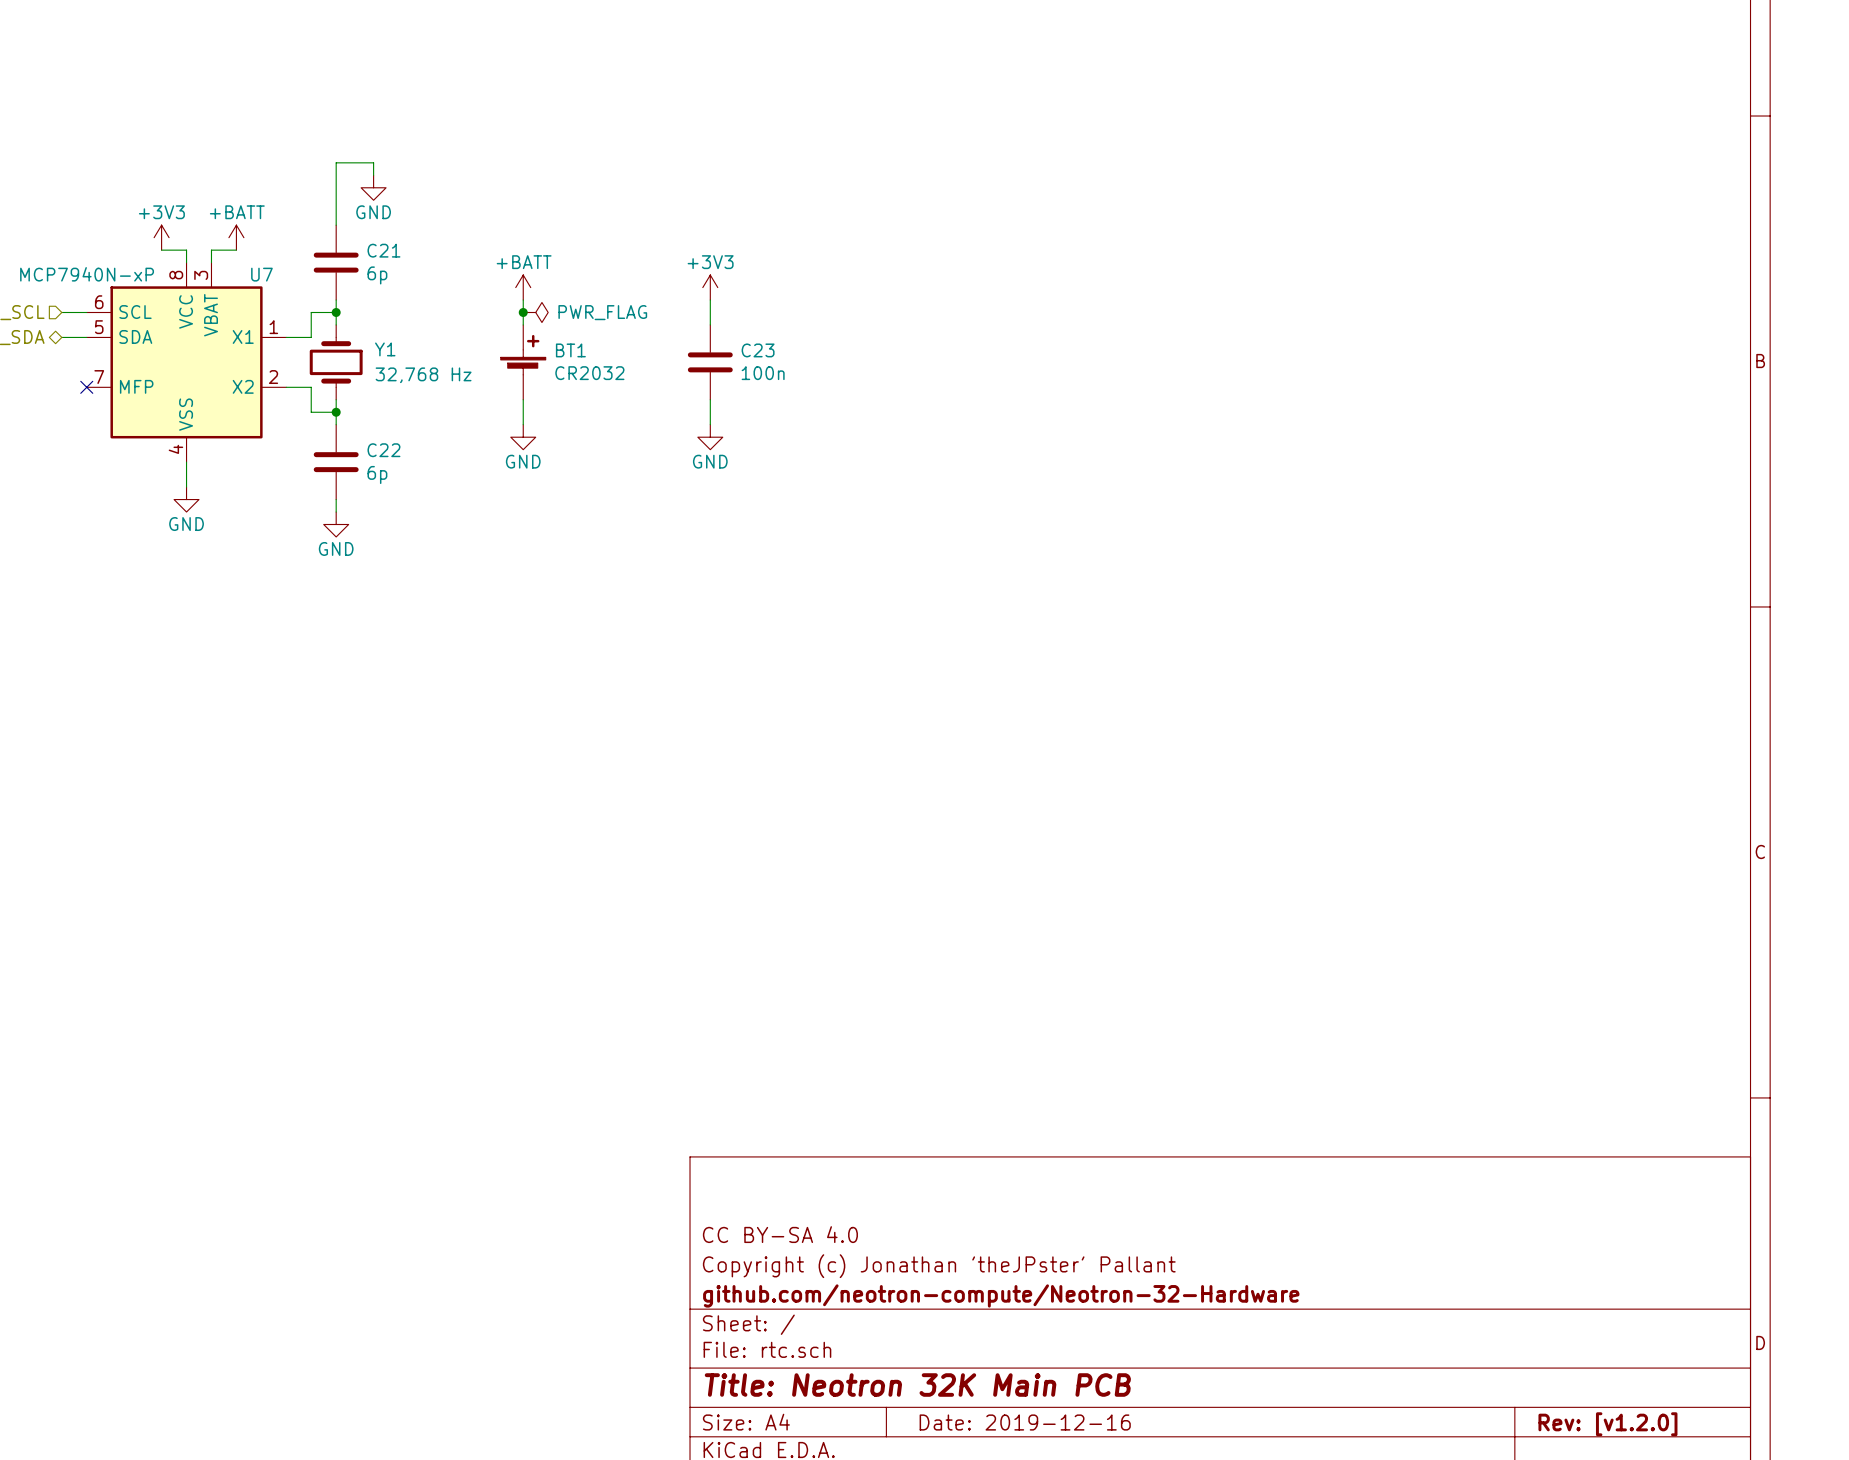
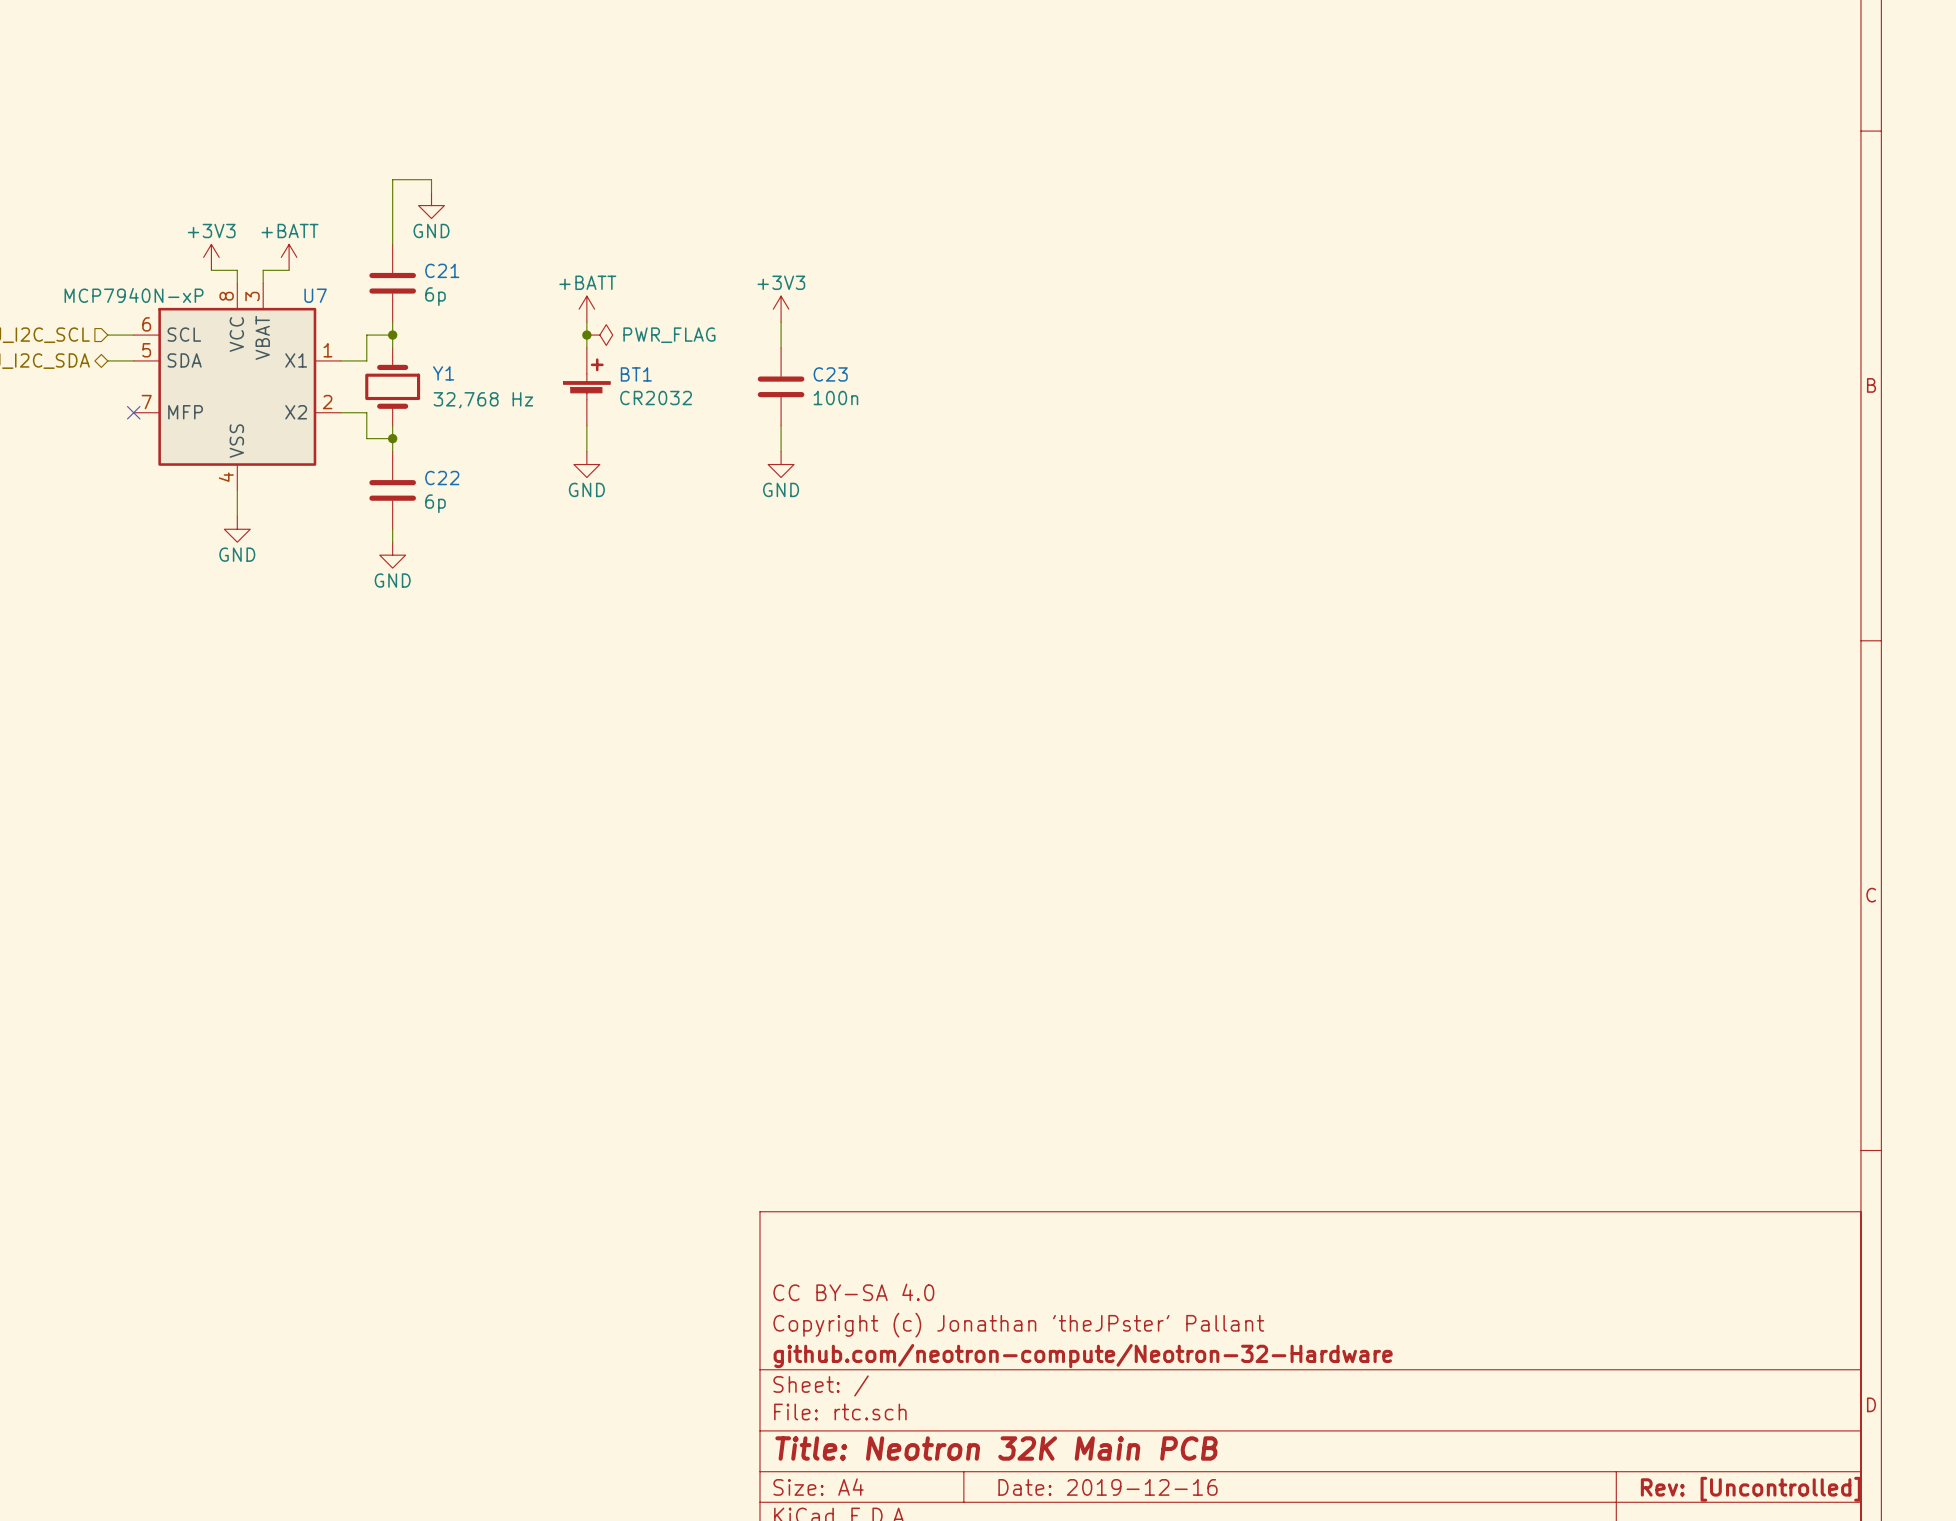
title block: Rev: [v1.2.0] (1607, 1424) -> Rev: [Uncontrolled] (1750, 1489)

